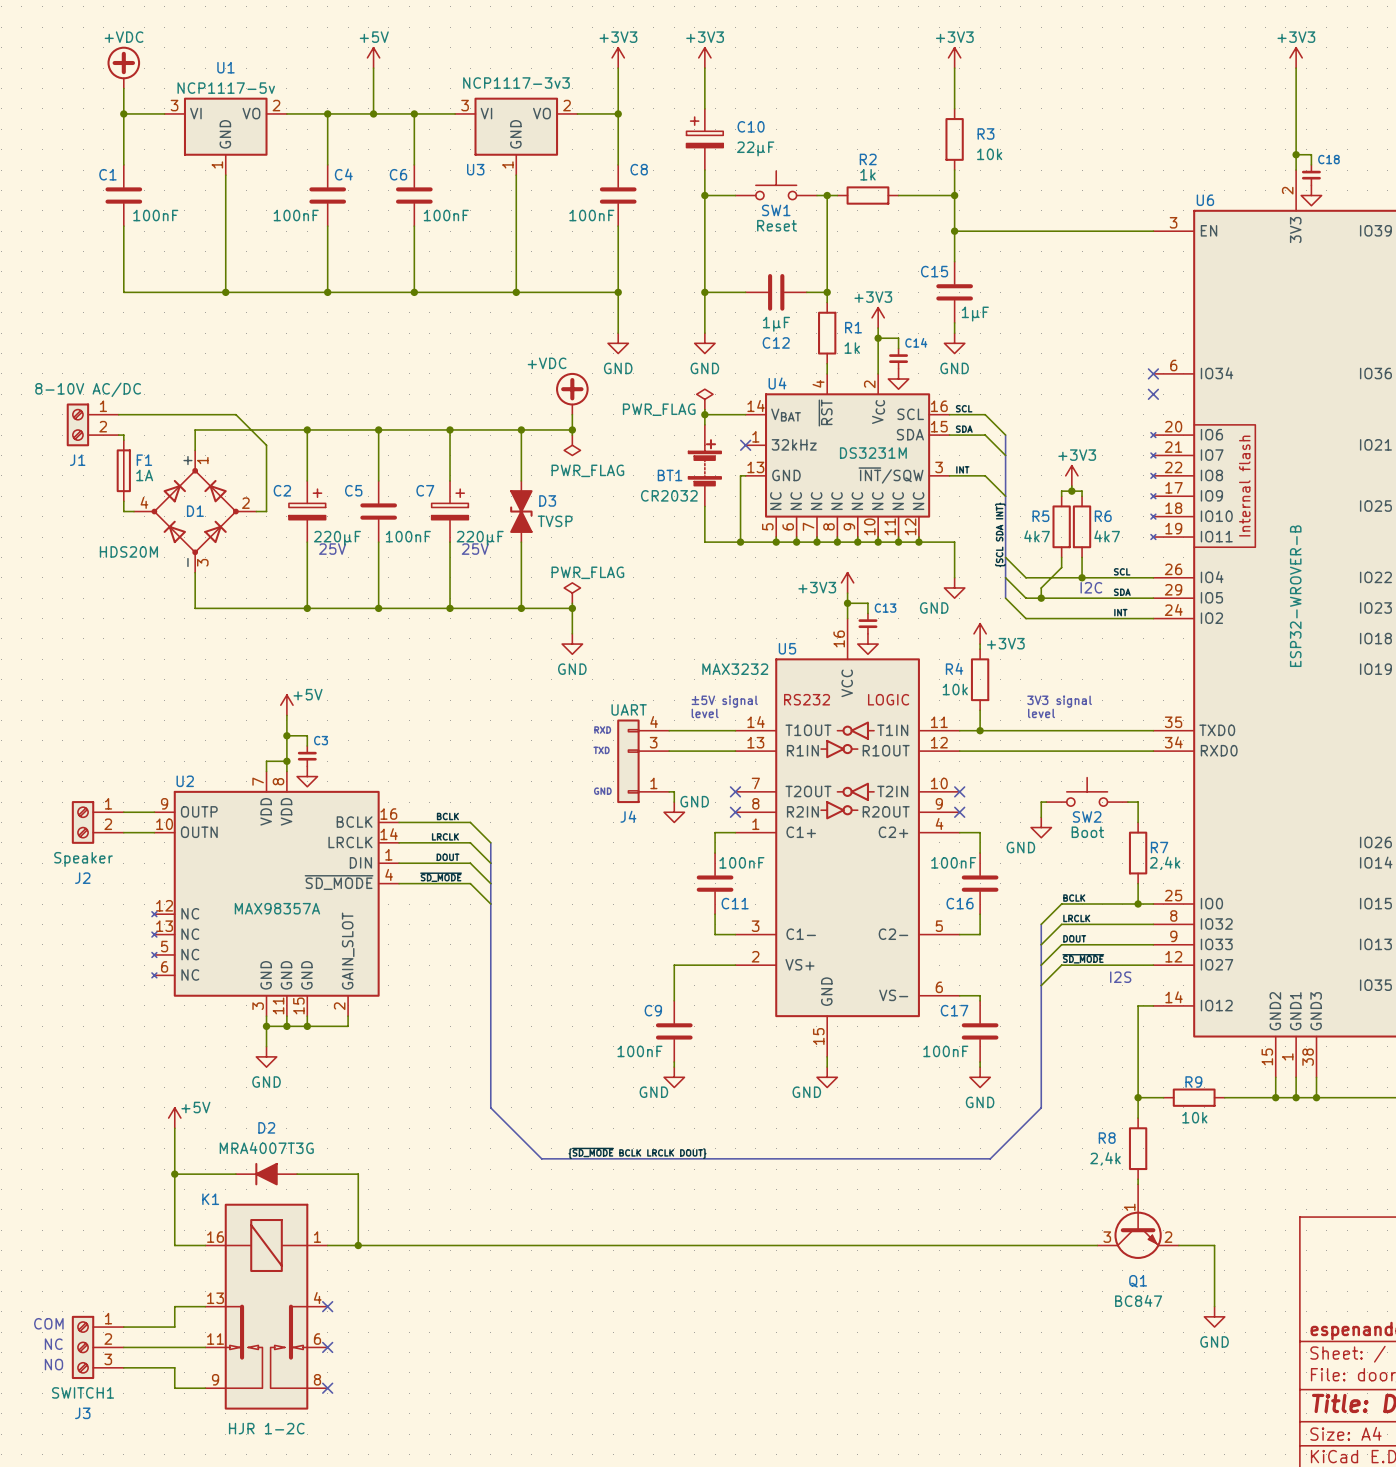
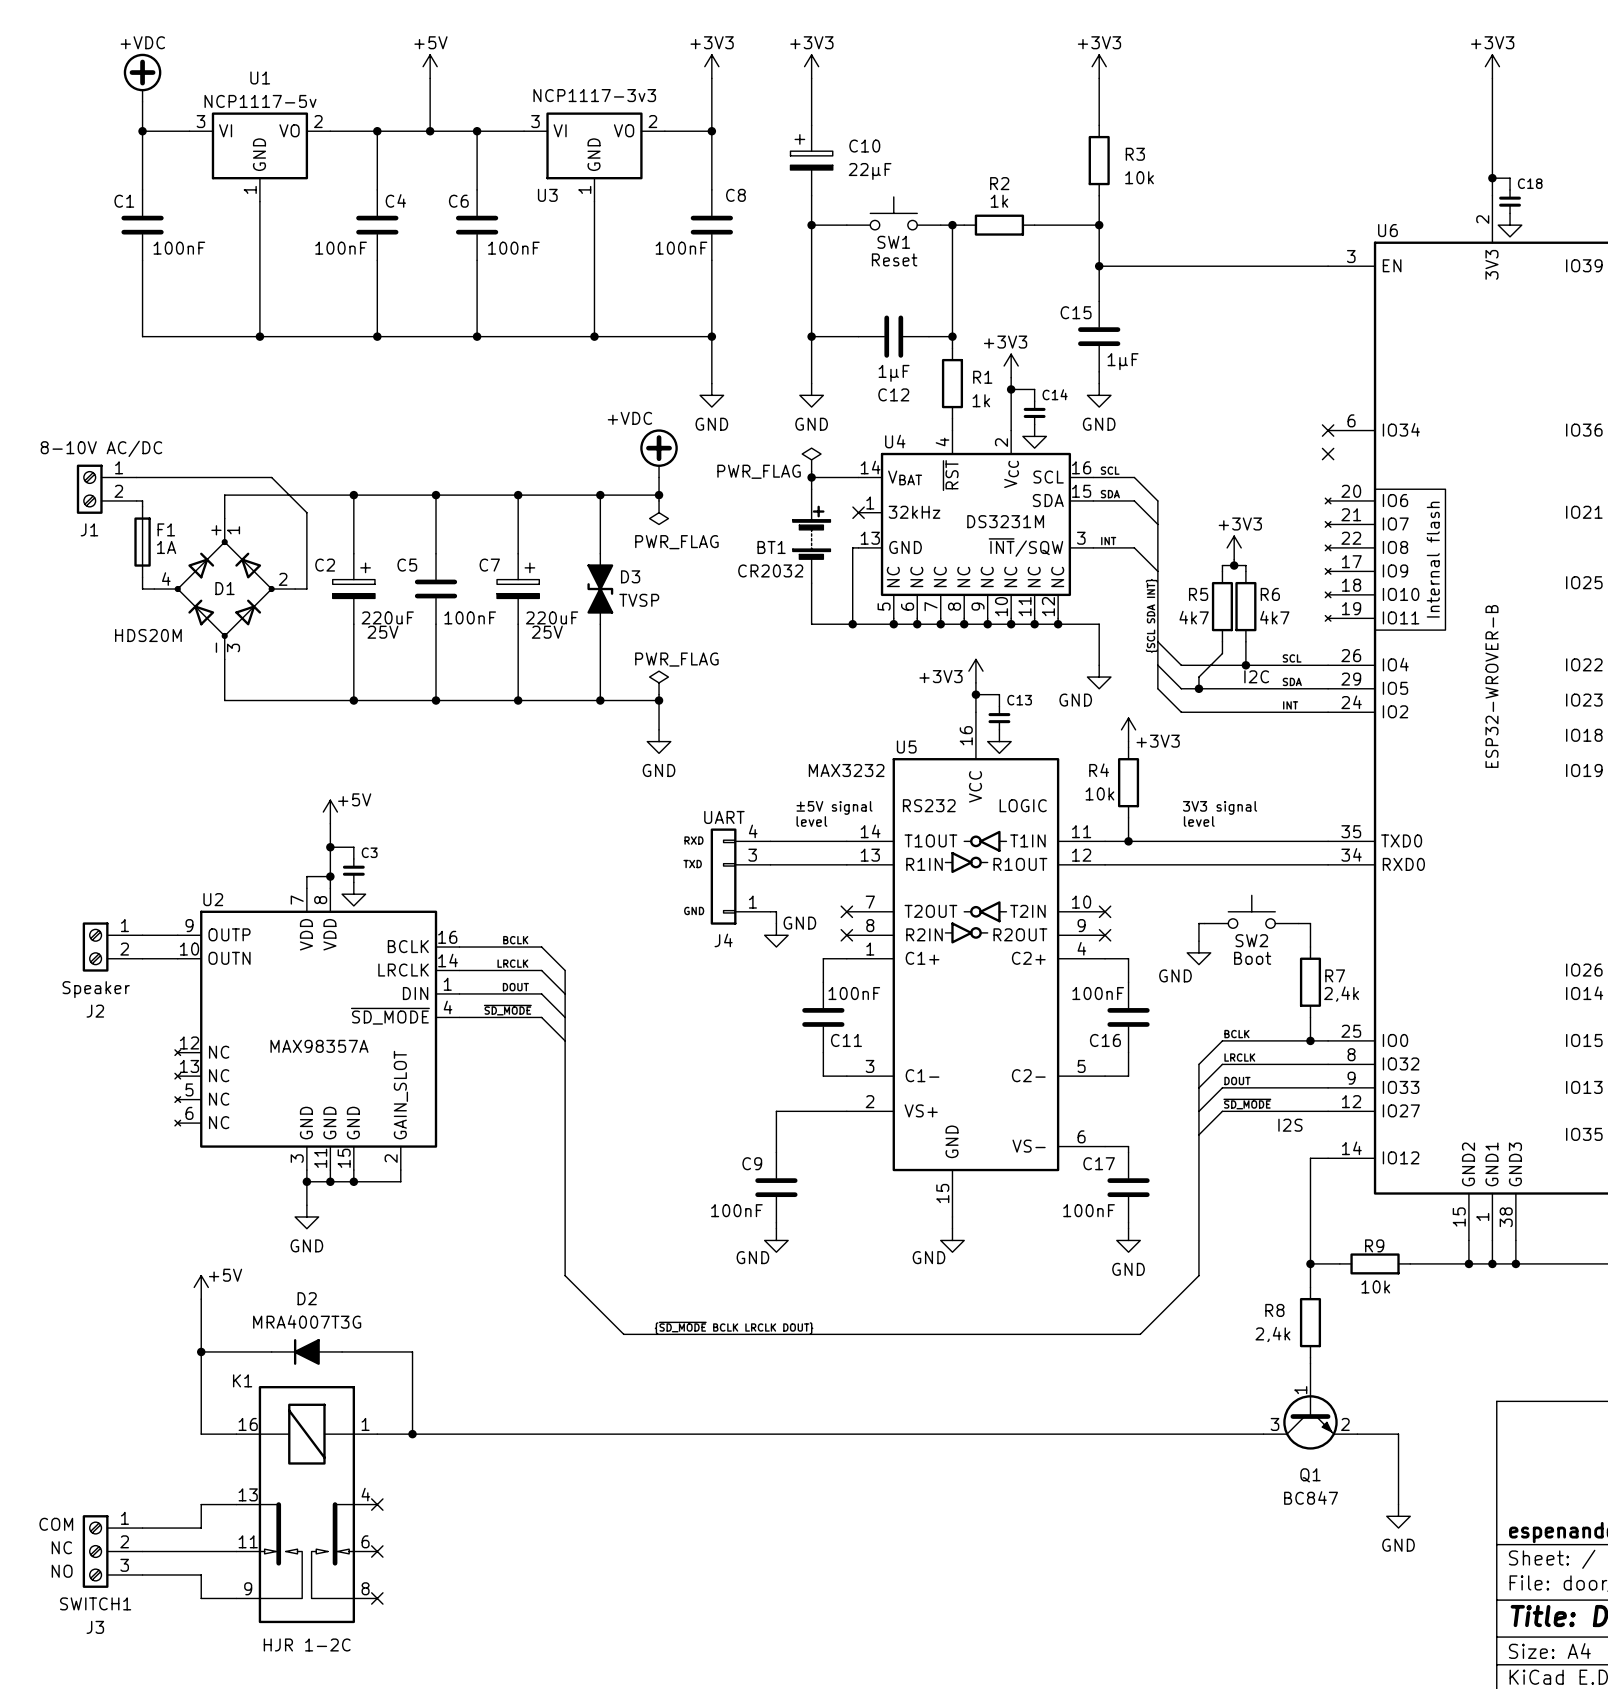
C2 value: 220µF (337, 538) -> 220uF (387, 617)
C7 value: 220µF (480, 538) -> 220uF (552, 617)

